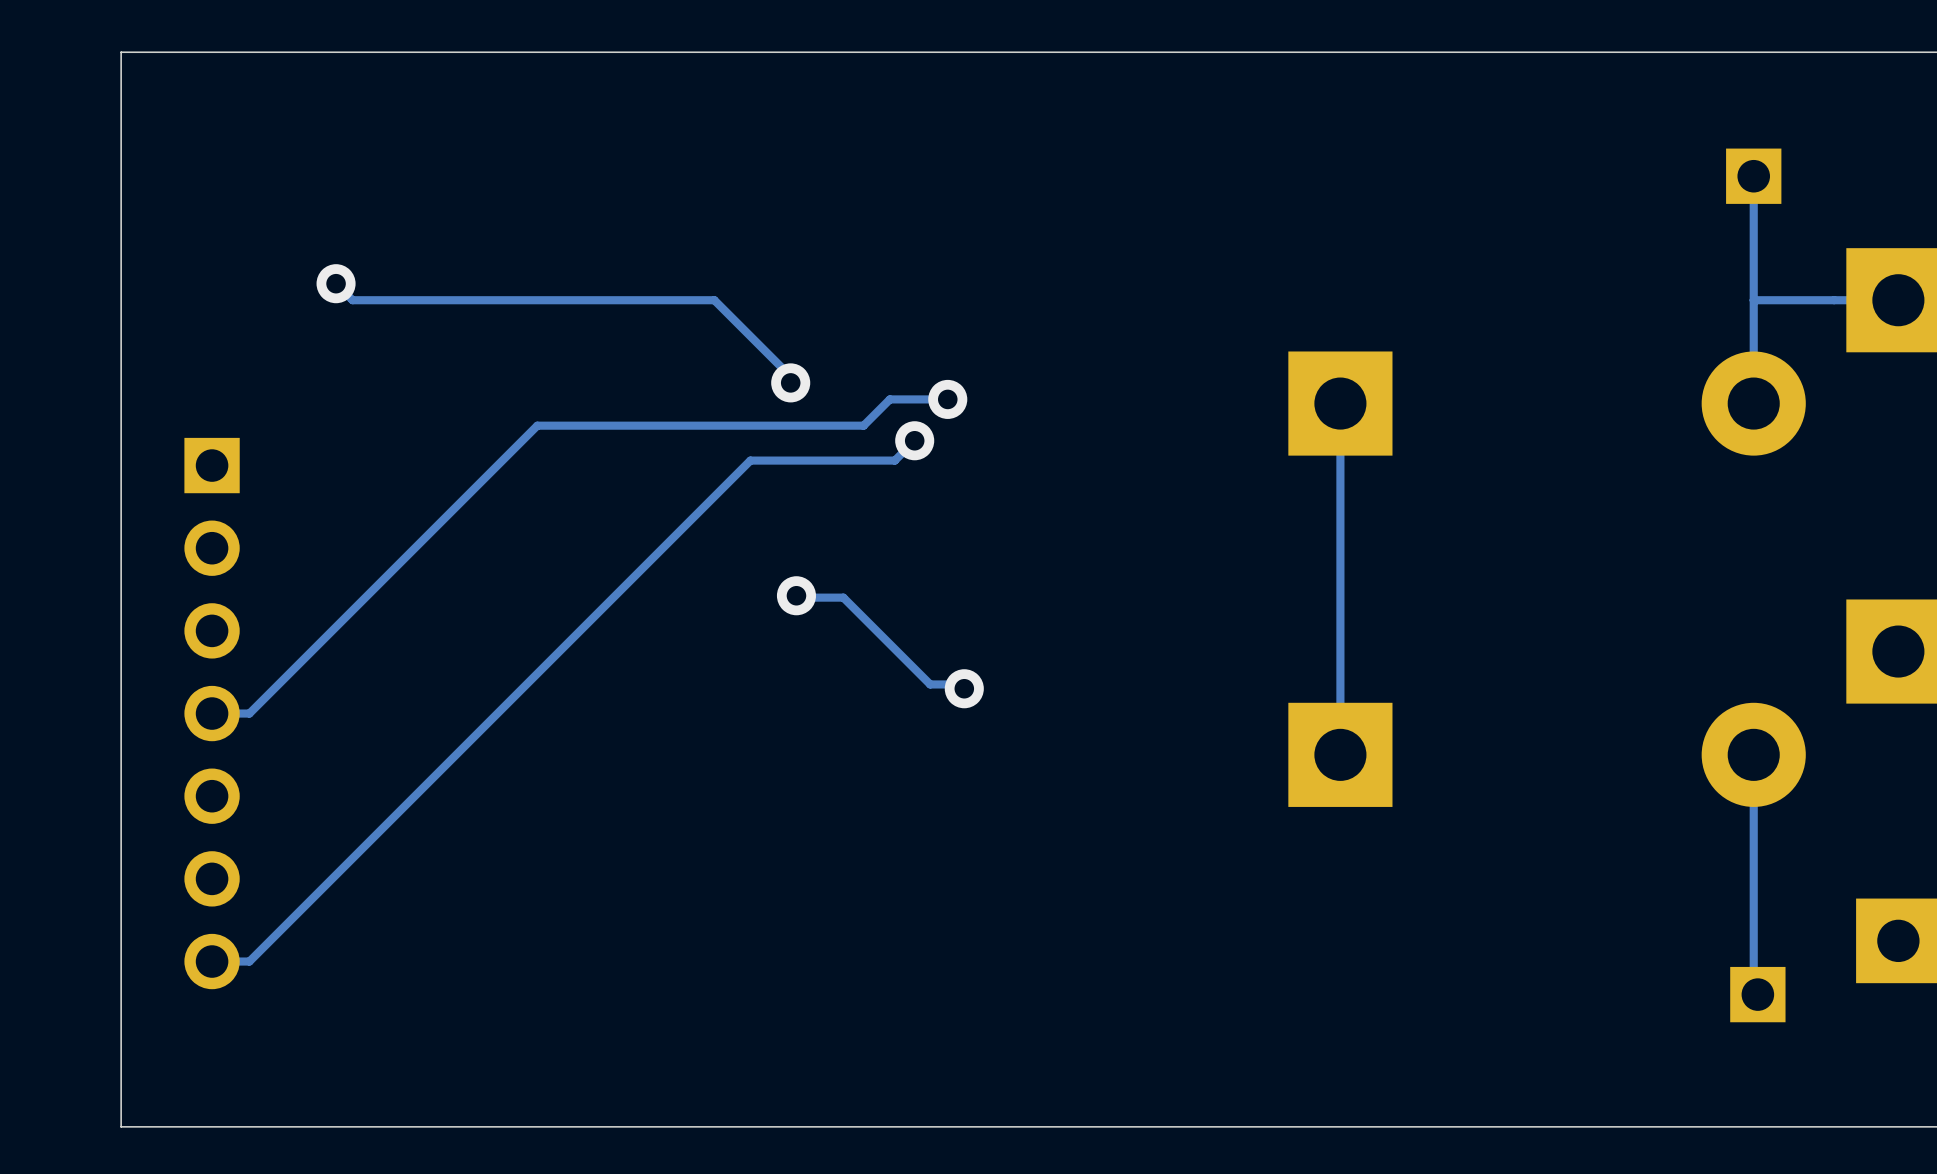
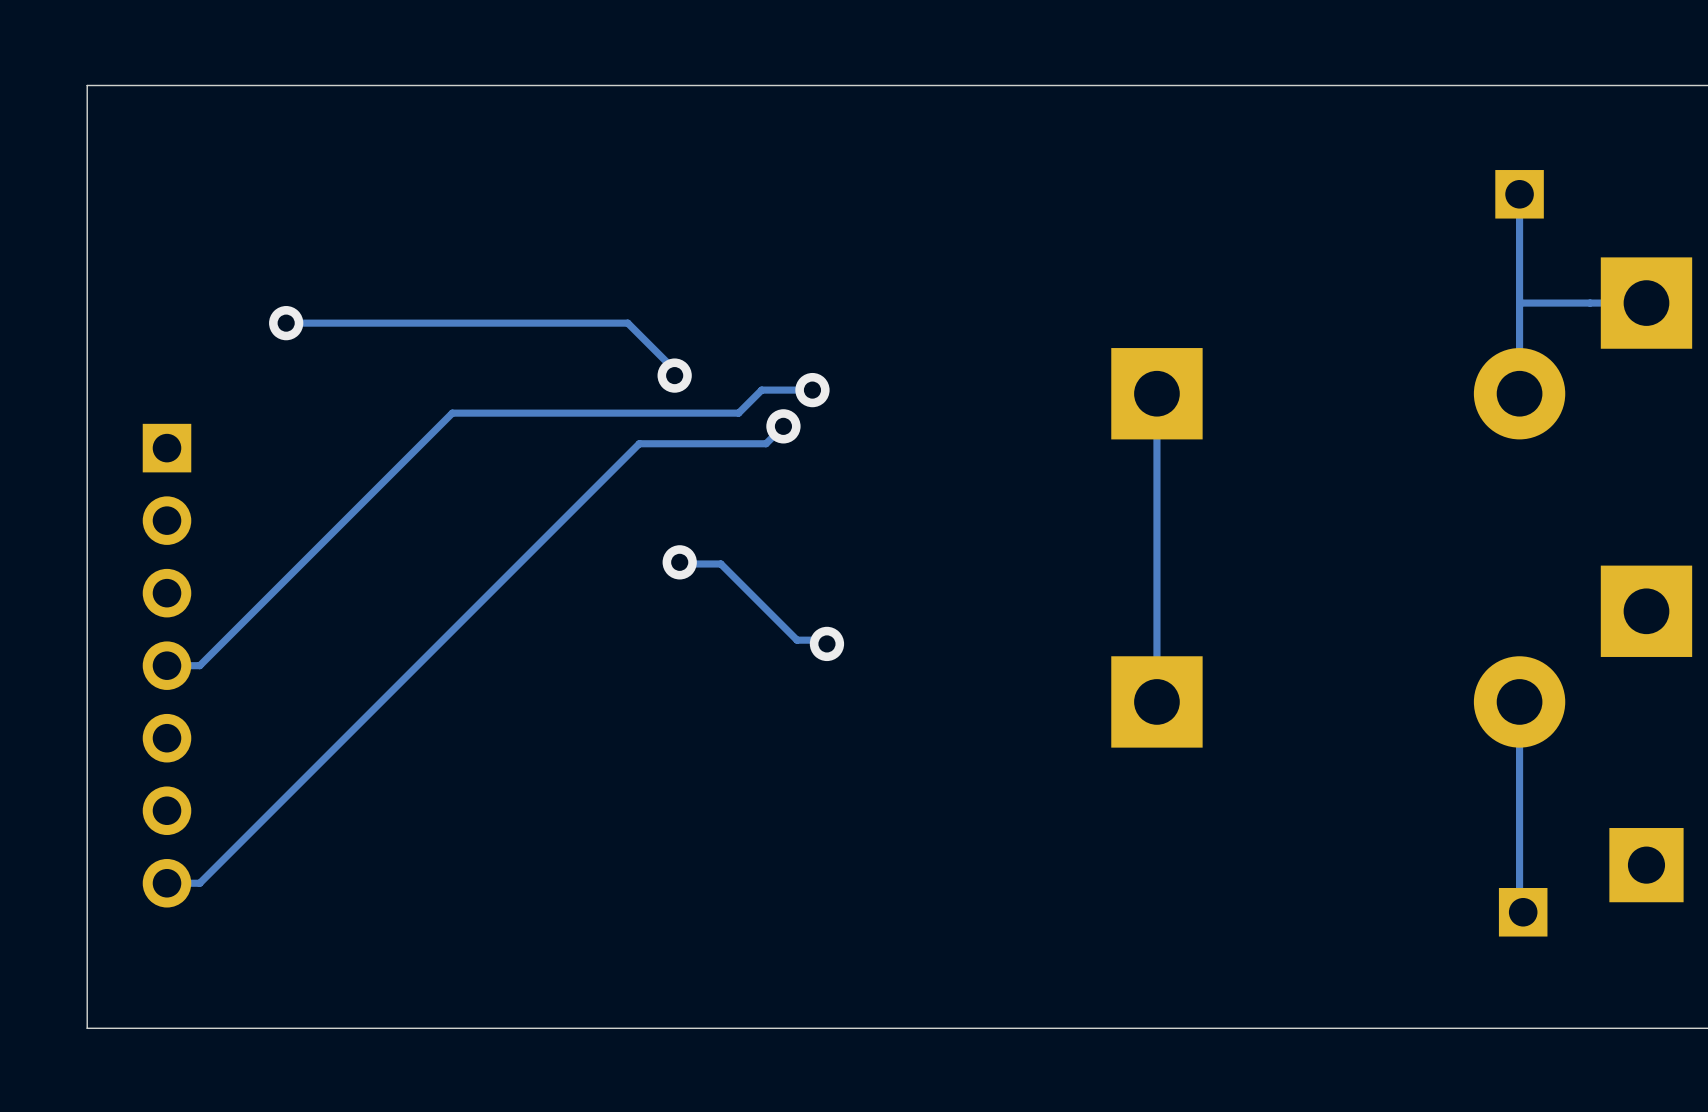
track: (336, 283) (352, 300) (714, 300) (737, 323) -> (286, 323) (627, 323)
via position: (336, 283) -> (286, 323)

